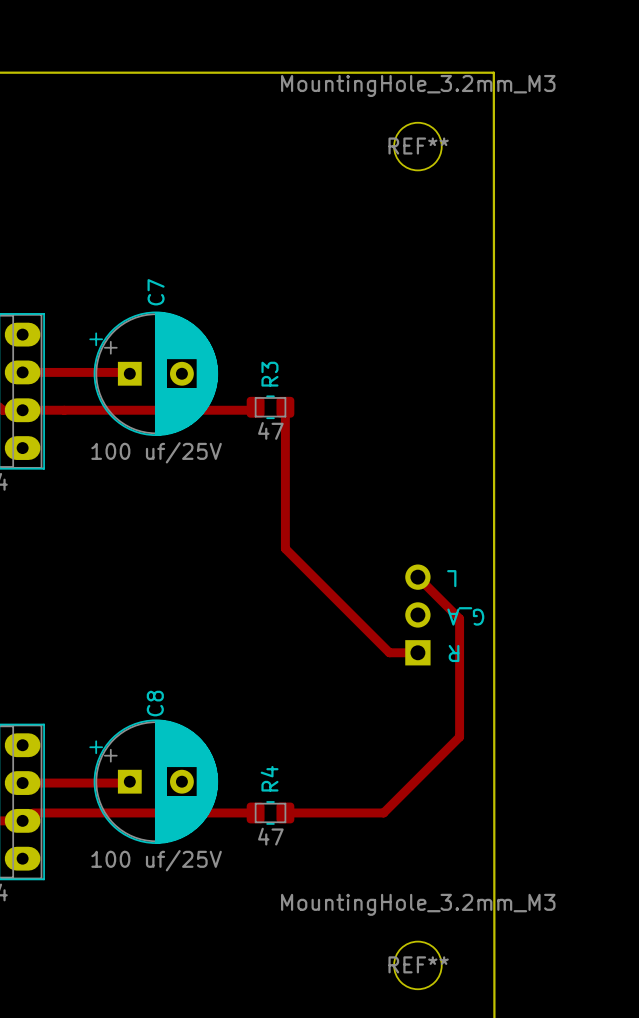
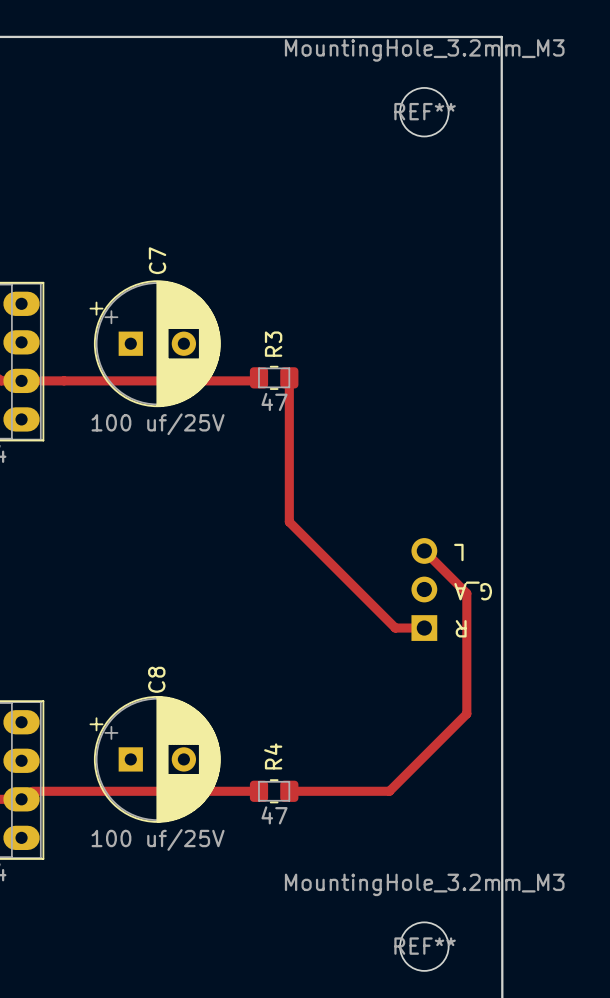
track: (22, 372) (128, 372) -> none
track: (22, 783) (128, 783) -> none

